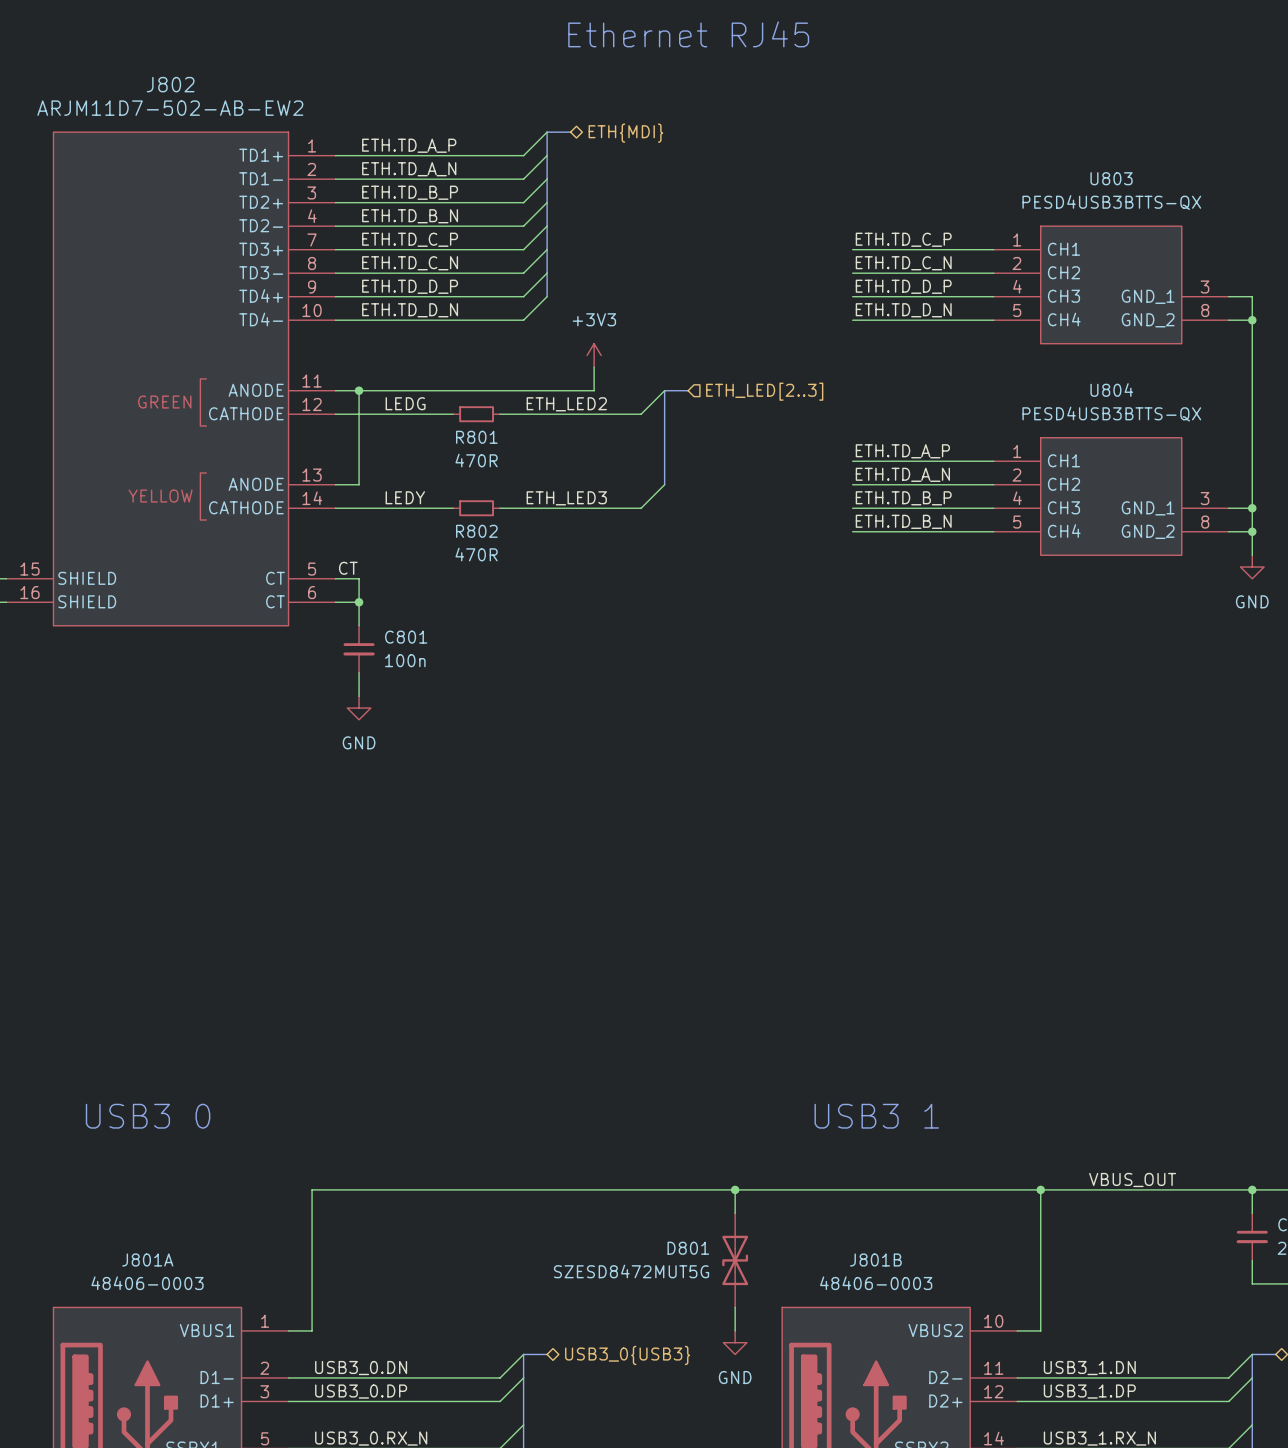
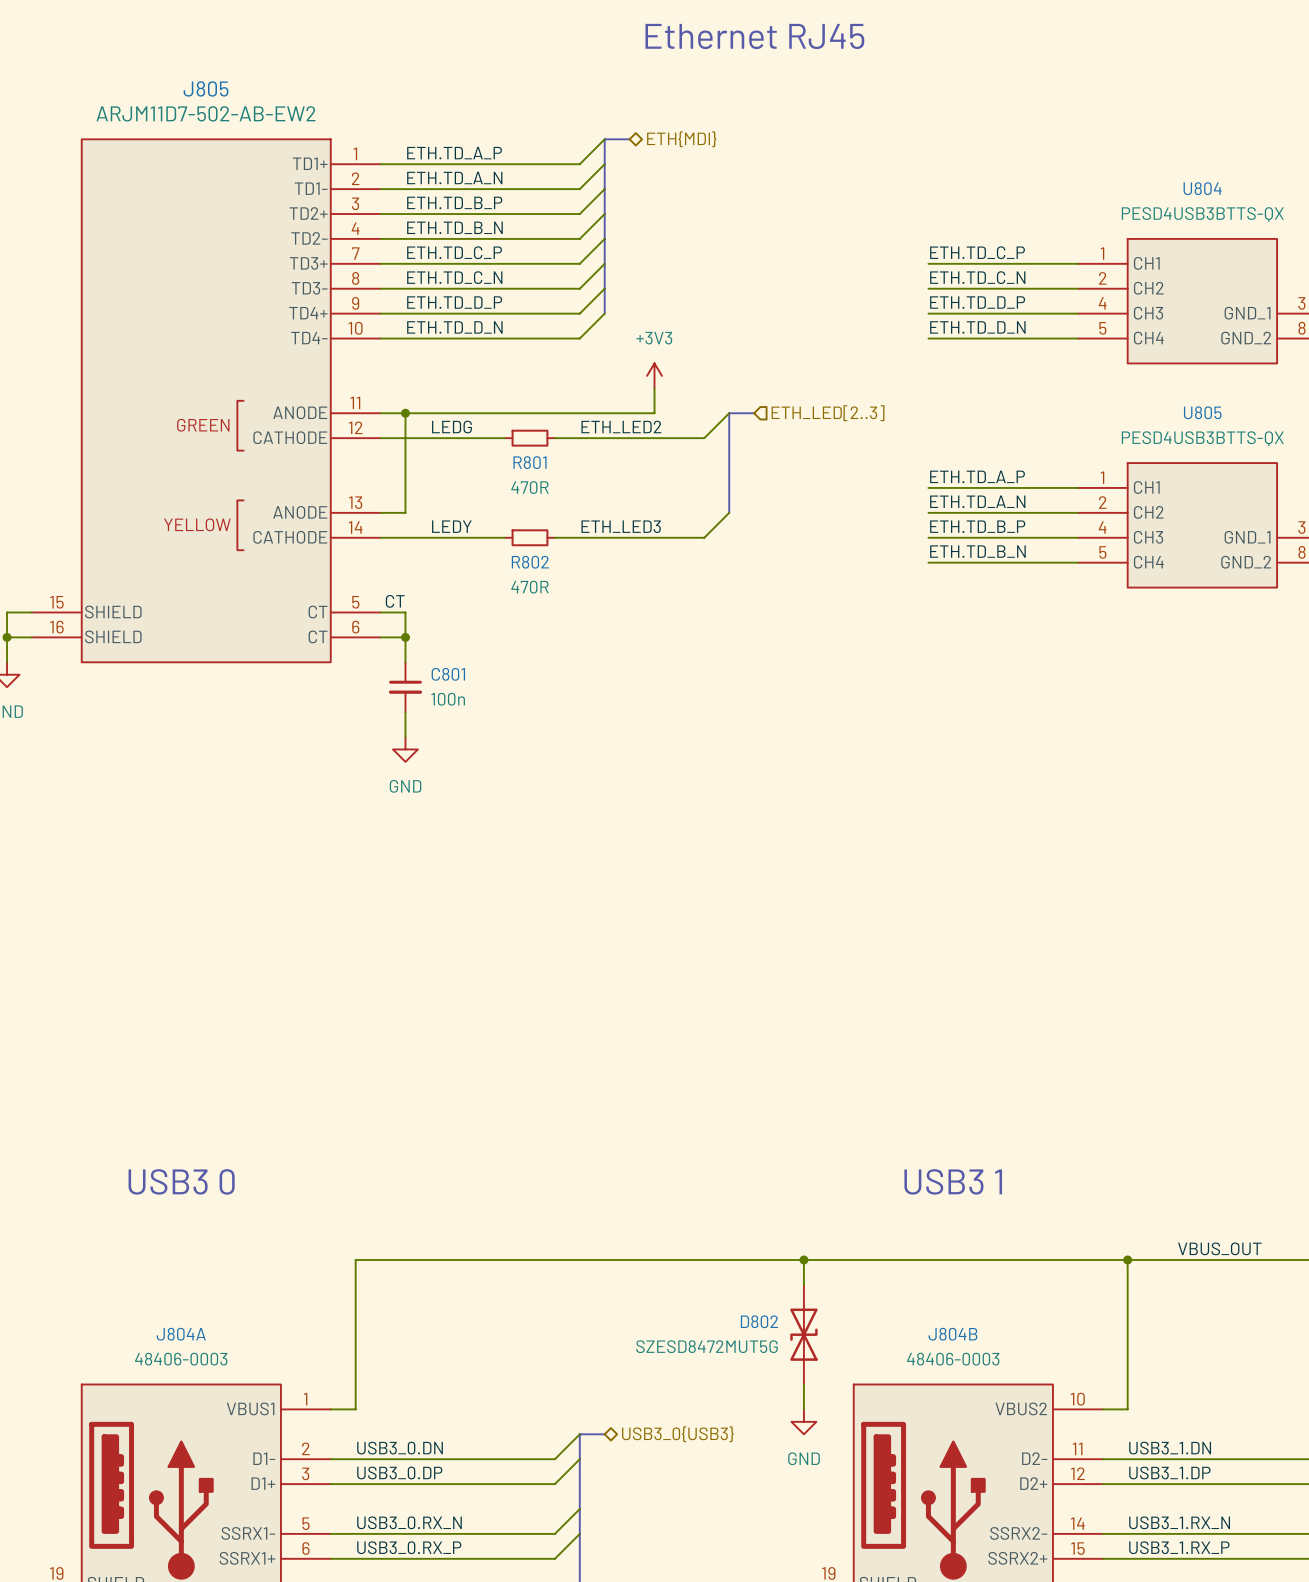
J802 name: J802 (170, 84) -> J805 (206, 88)
U803 name: U803 (1111, 178) -> U804 (1202, 188)
U804 name: U804 (1111, 390) -> U805 (1202, 412)
D801 name: D801 (688, 1248) -> D802 (759, 1321)
J801A name: J801A (147, 1260) -> J804A (181, 1334)
J801B name: J801B (875, 1260) -> J804B (952, 1334)

